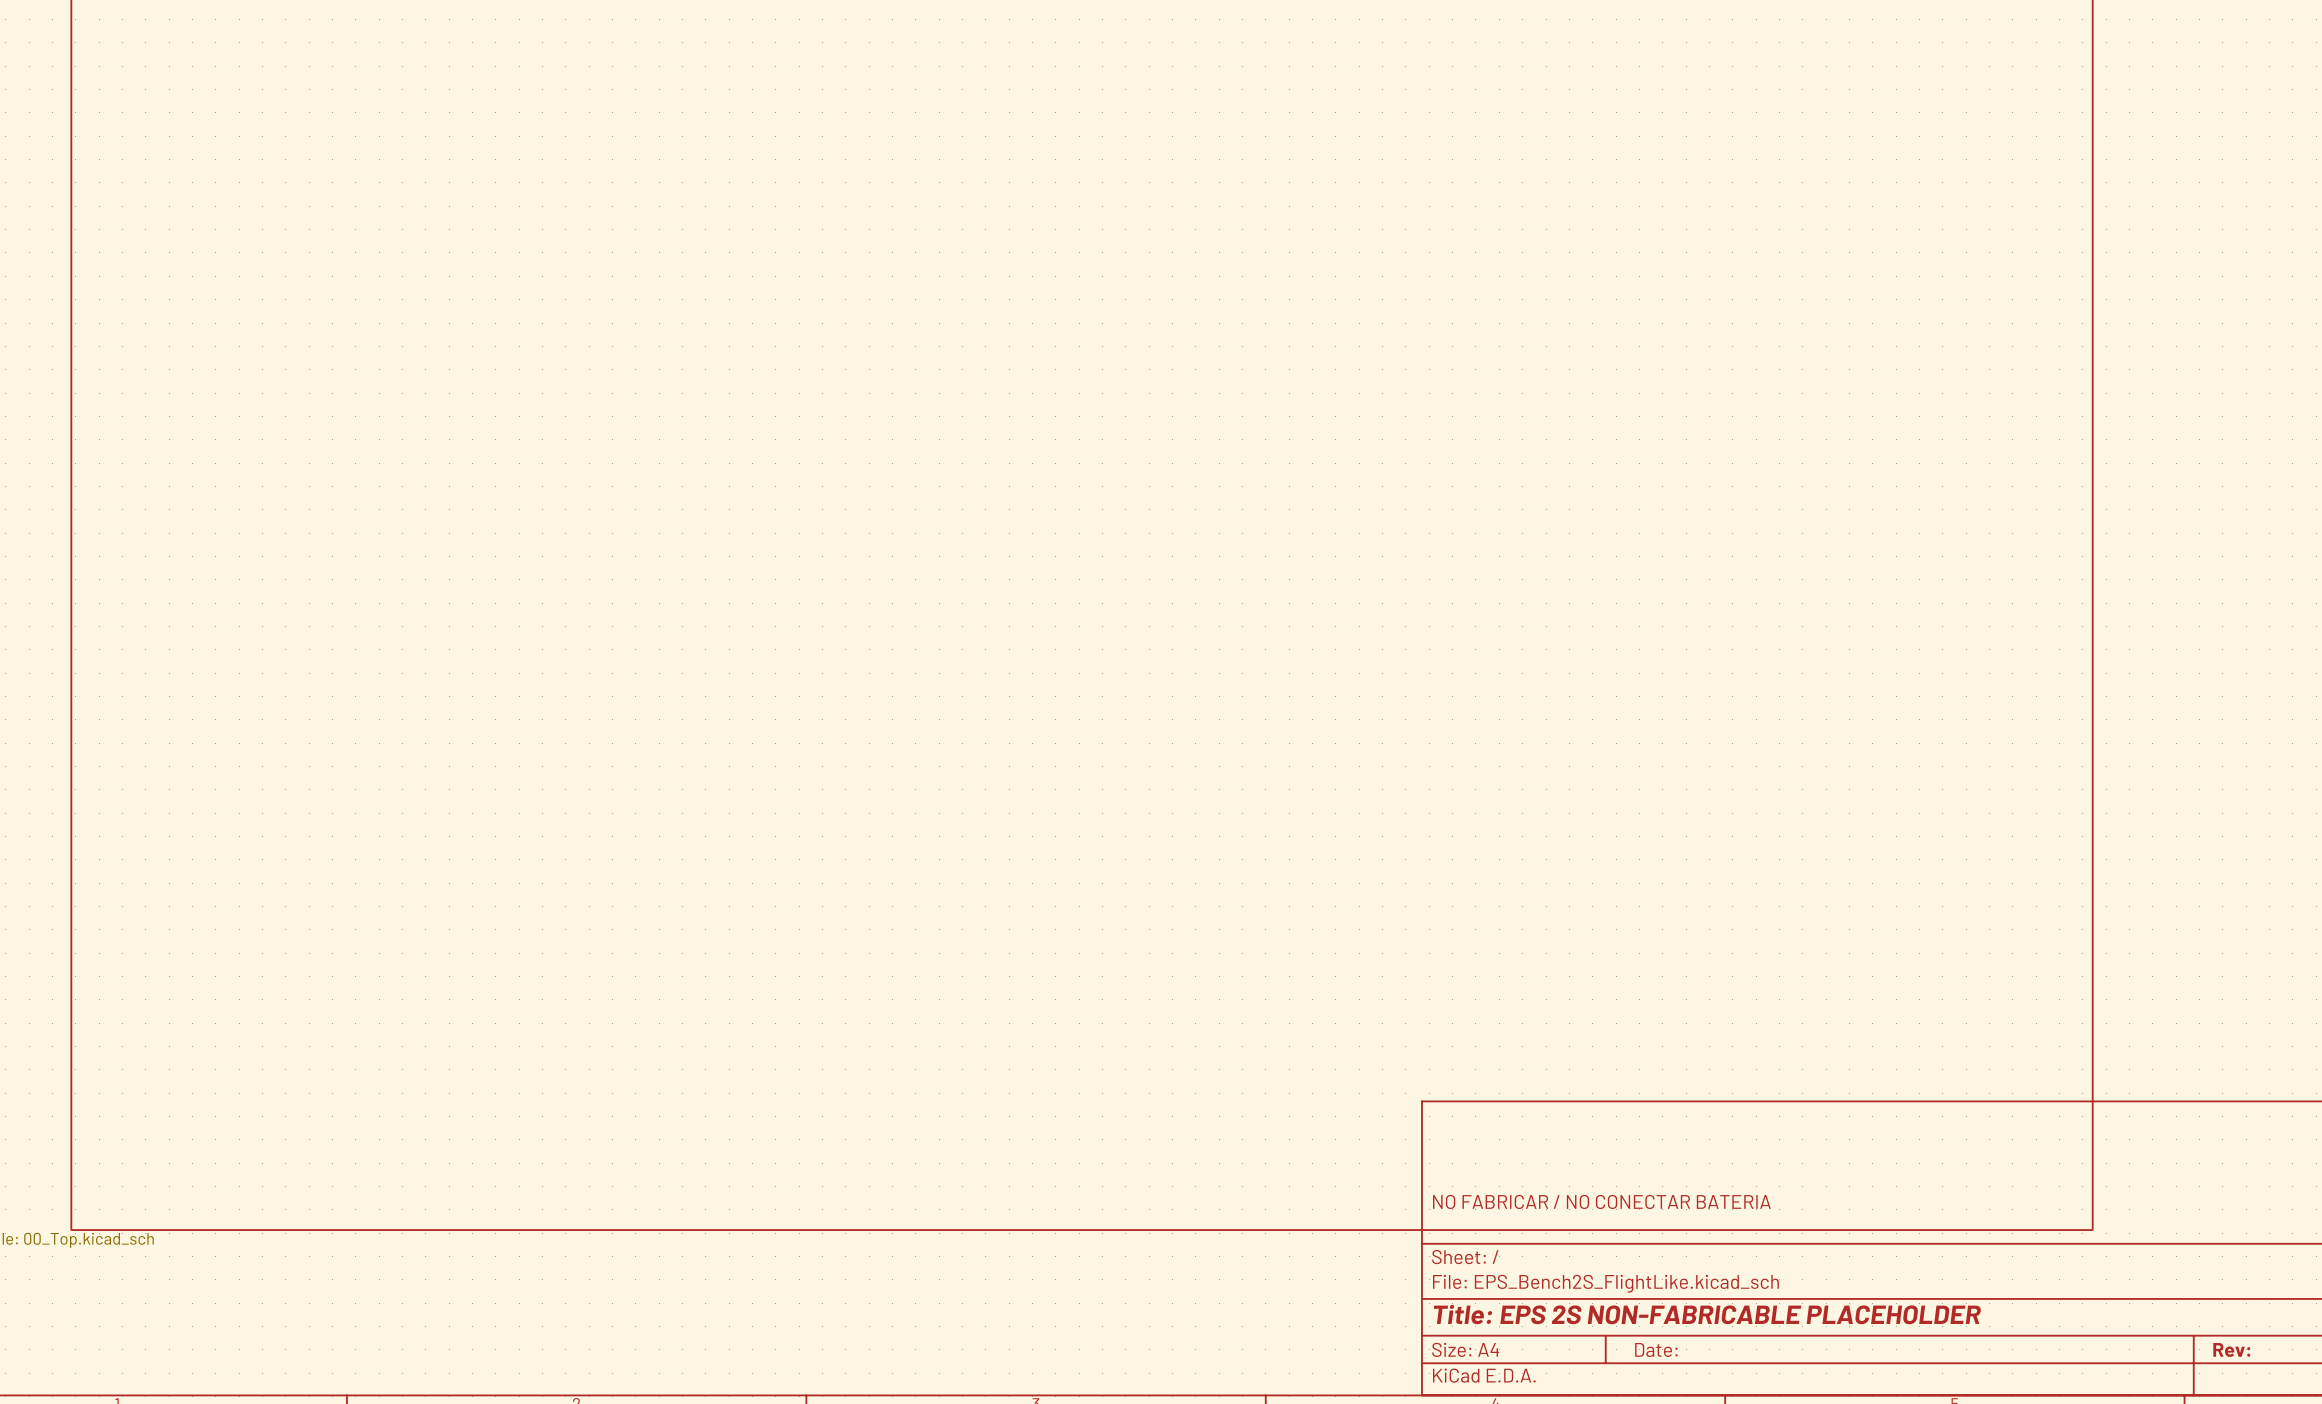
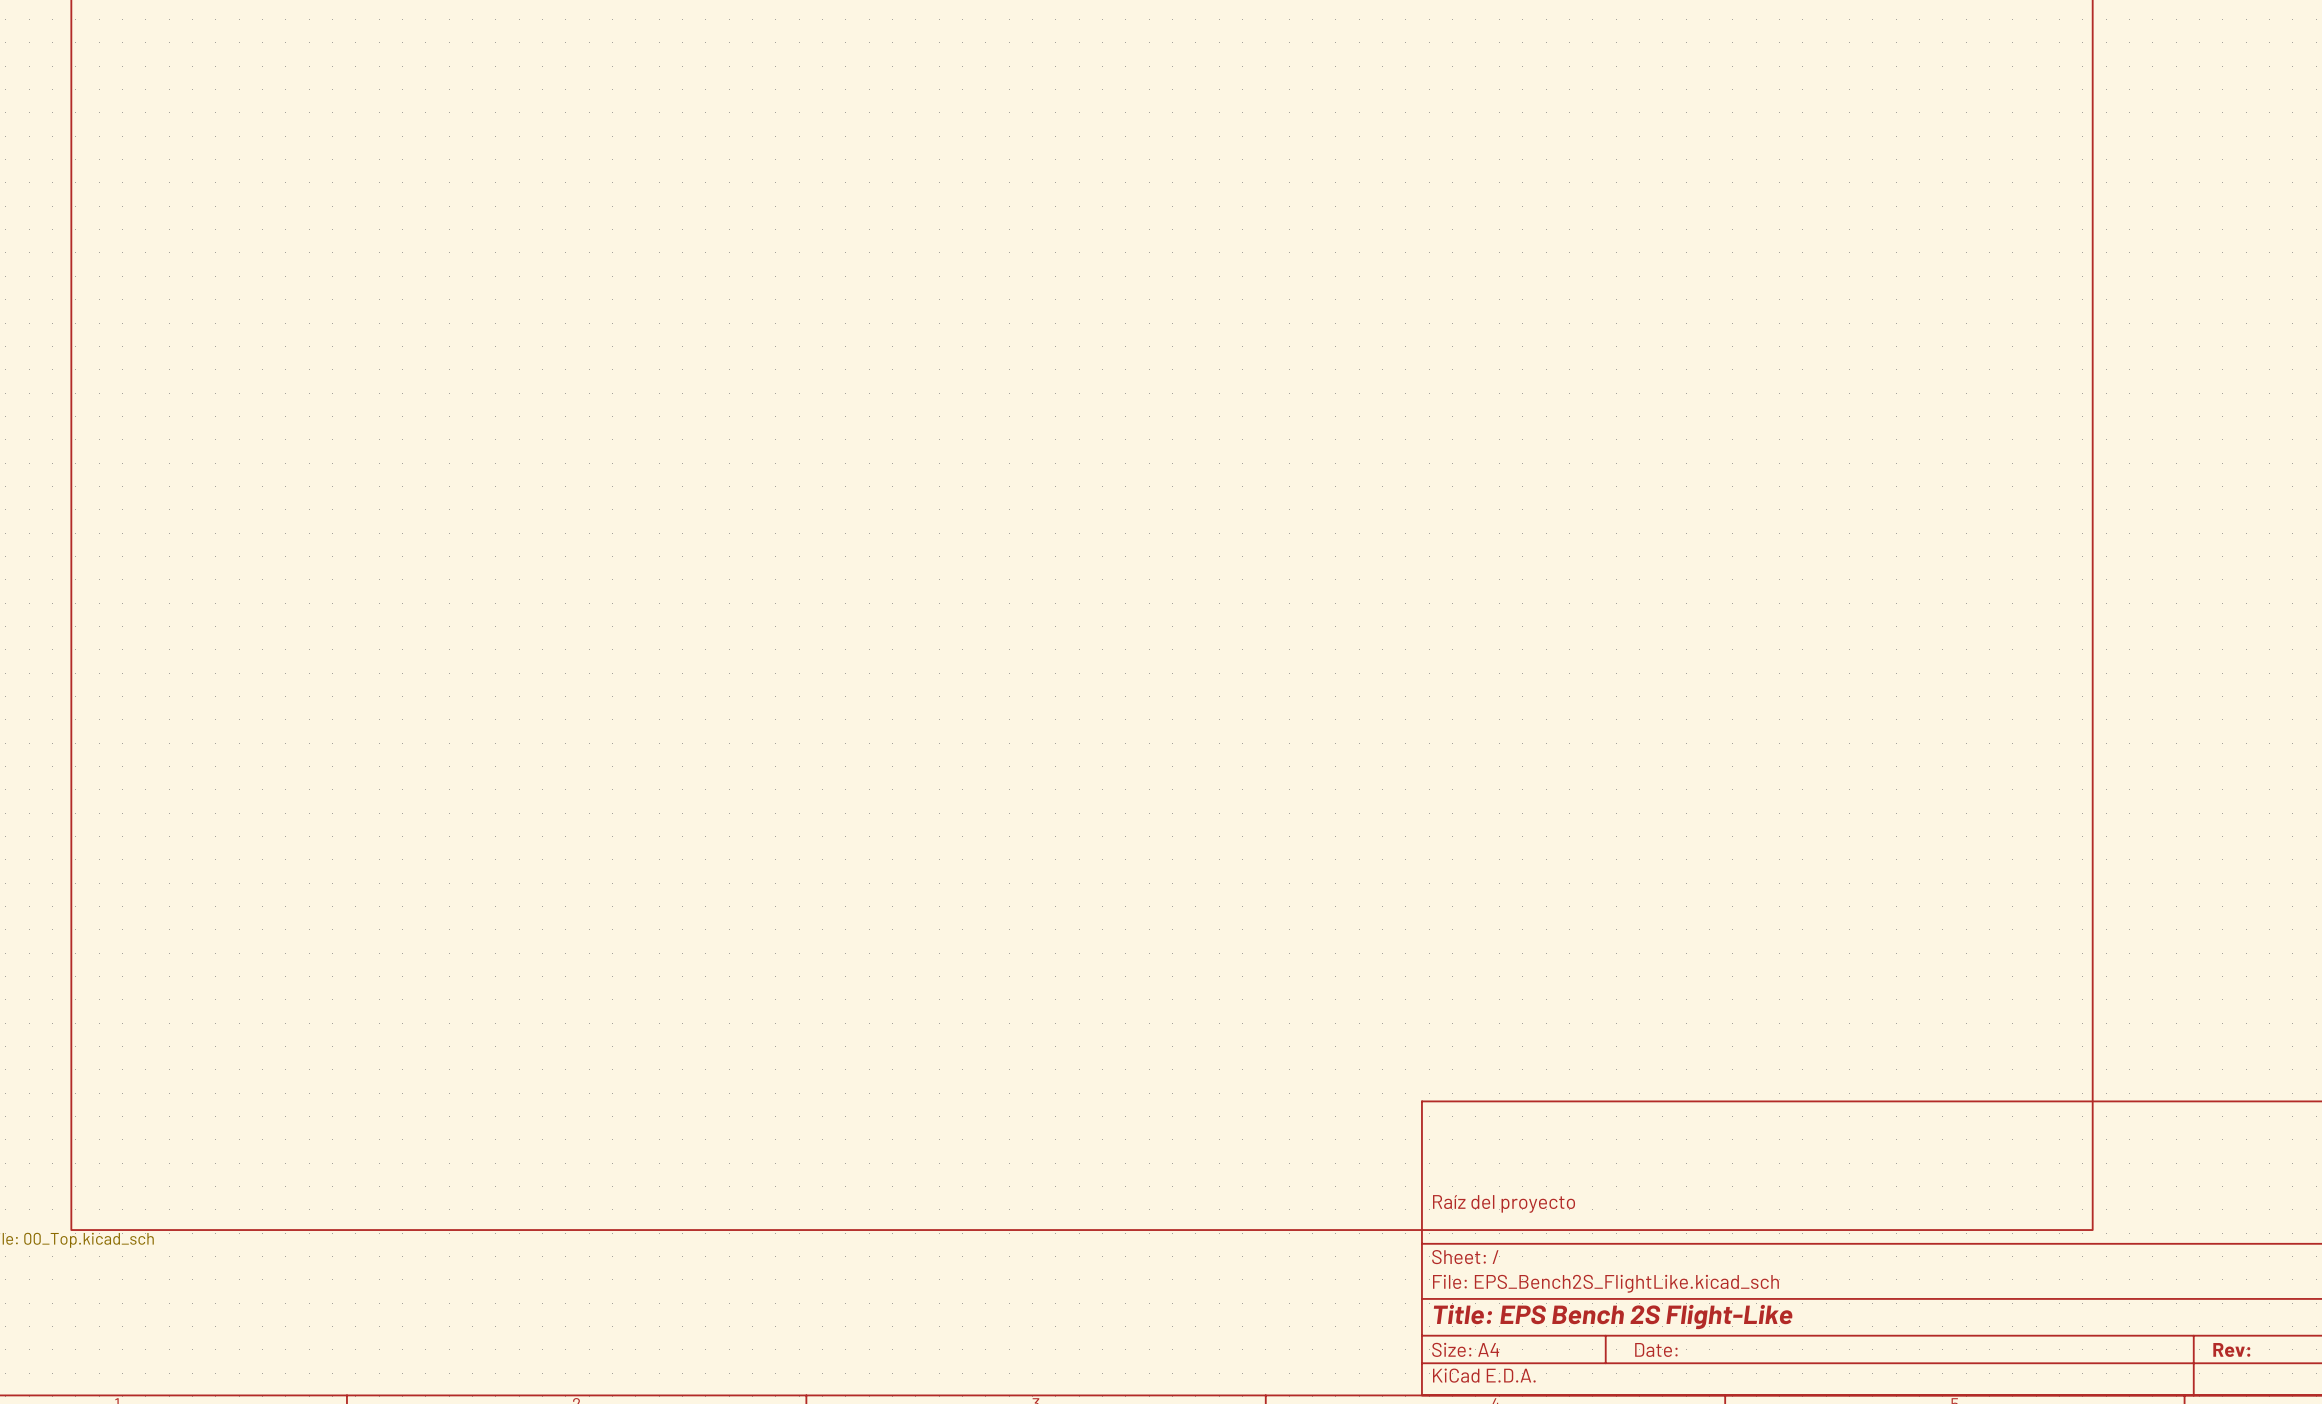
title block: NO FABRICAR / NO CONECTAR BATERIA (1601, 1201) -> Raíz del proyecto (1504, 1203)
title block: Title: EPS 2S NON-FABRICABLE PLACEHOLDER (1707, 1314) -> Title: EPS Bench 2S Flight-Like (1613, 1316)

